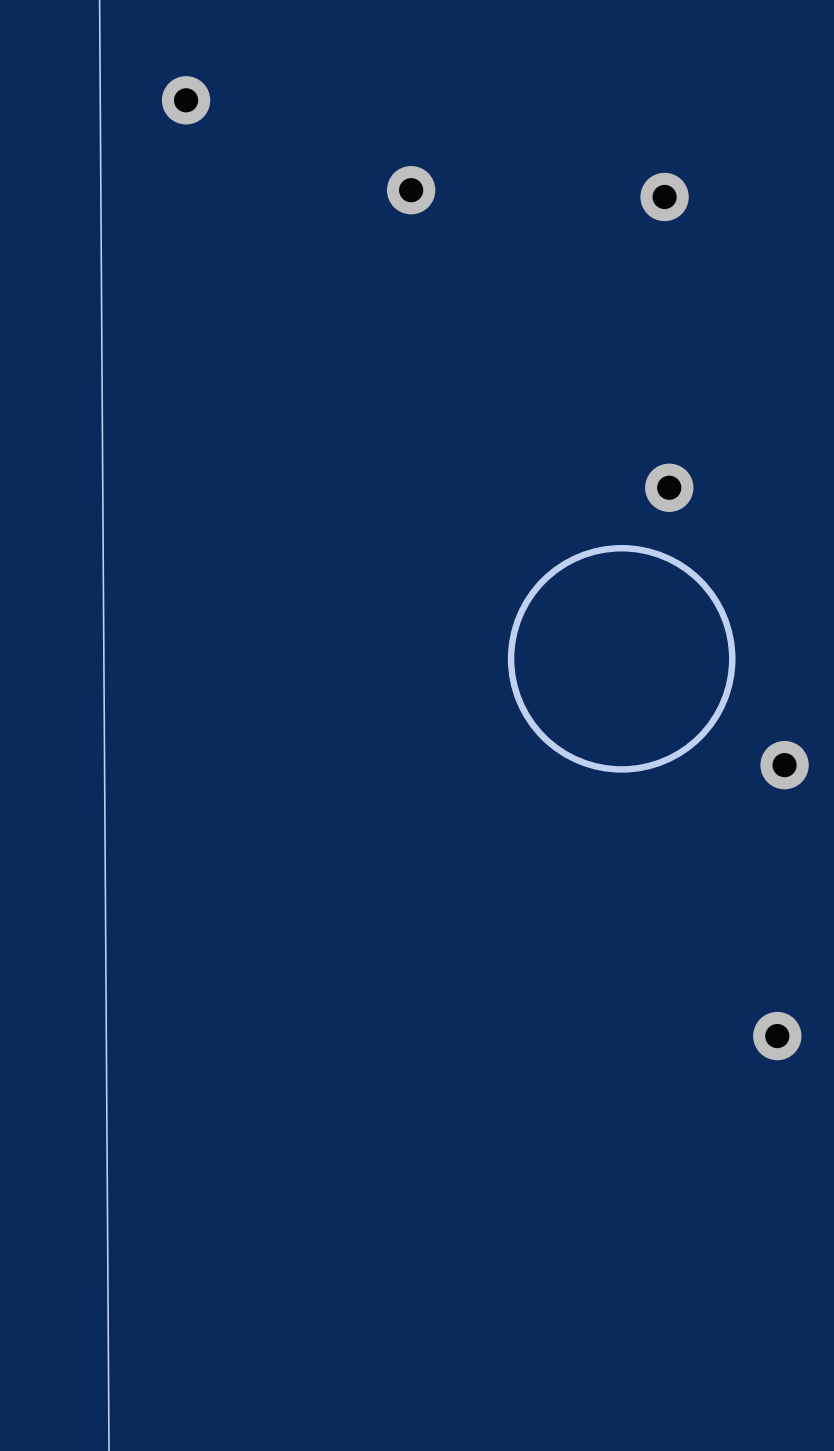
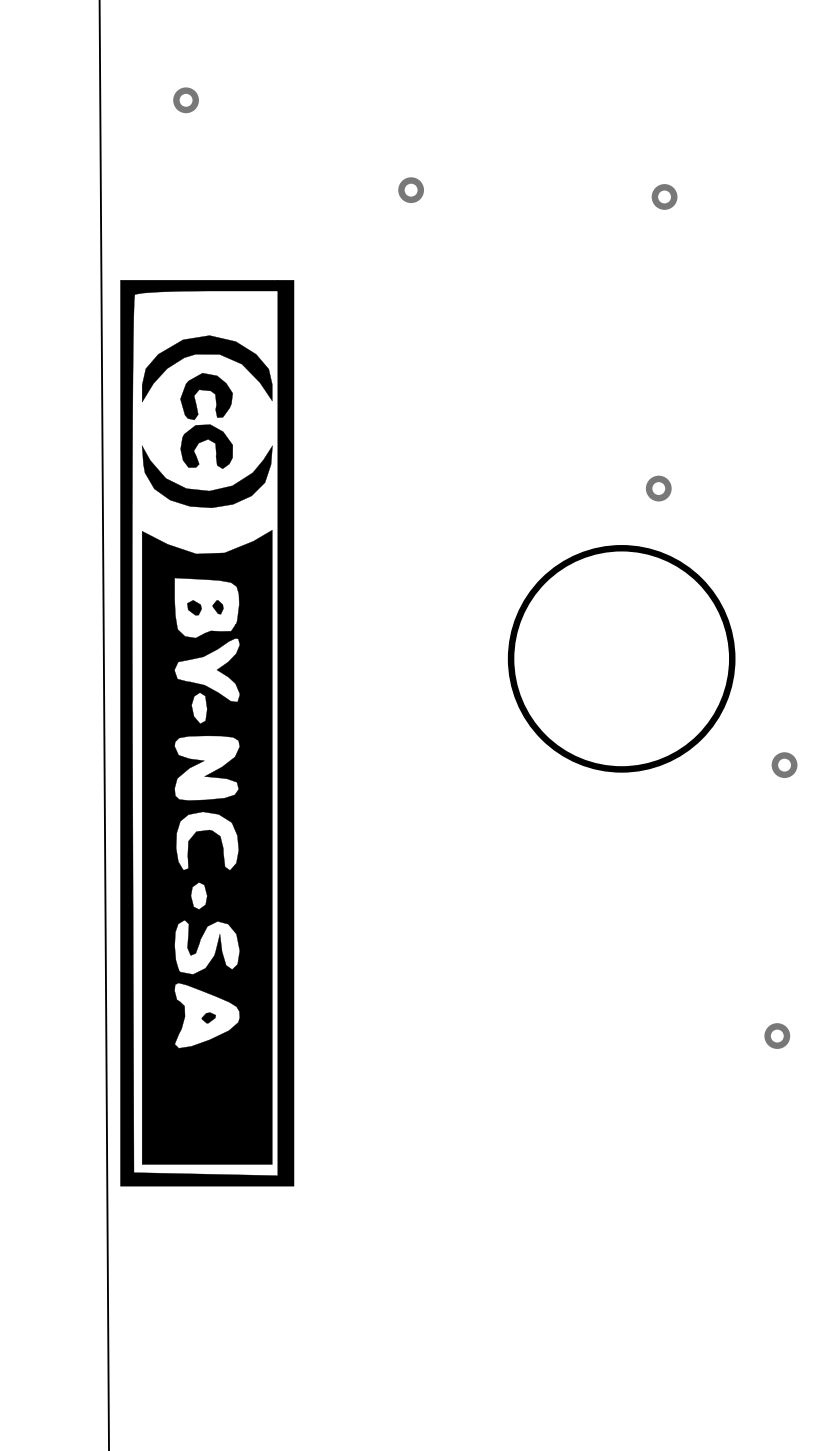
via size: [161, 76, 211, 125] -> [173, 87, 199, 114]
via size: [386, 165, 436, 215] -> [398, 177, 425, 204]
via size: [640, 172, 689, 222] -> [651, 184, 678, 210]
drawing: none -> [120, 280, 295, 1187]
via size: [645, 463, 694, 512] -> [645, 475, 672, 502]
via size: [760, 740, 809, 790] -> [771, 752, 798, 779]
via size: [753, 1011, 802, 1061] -> [764, 1023, 791, 1049]

